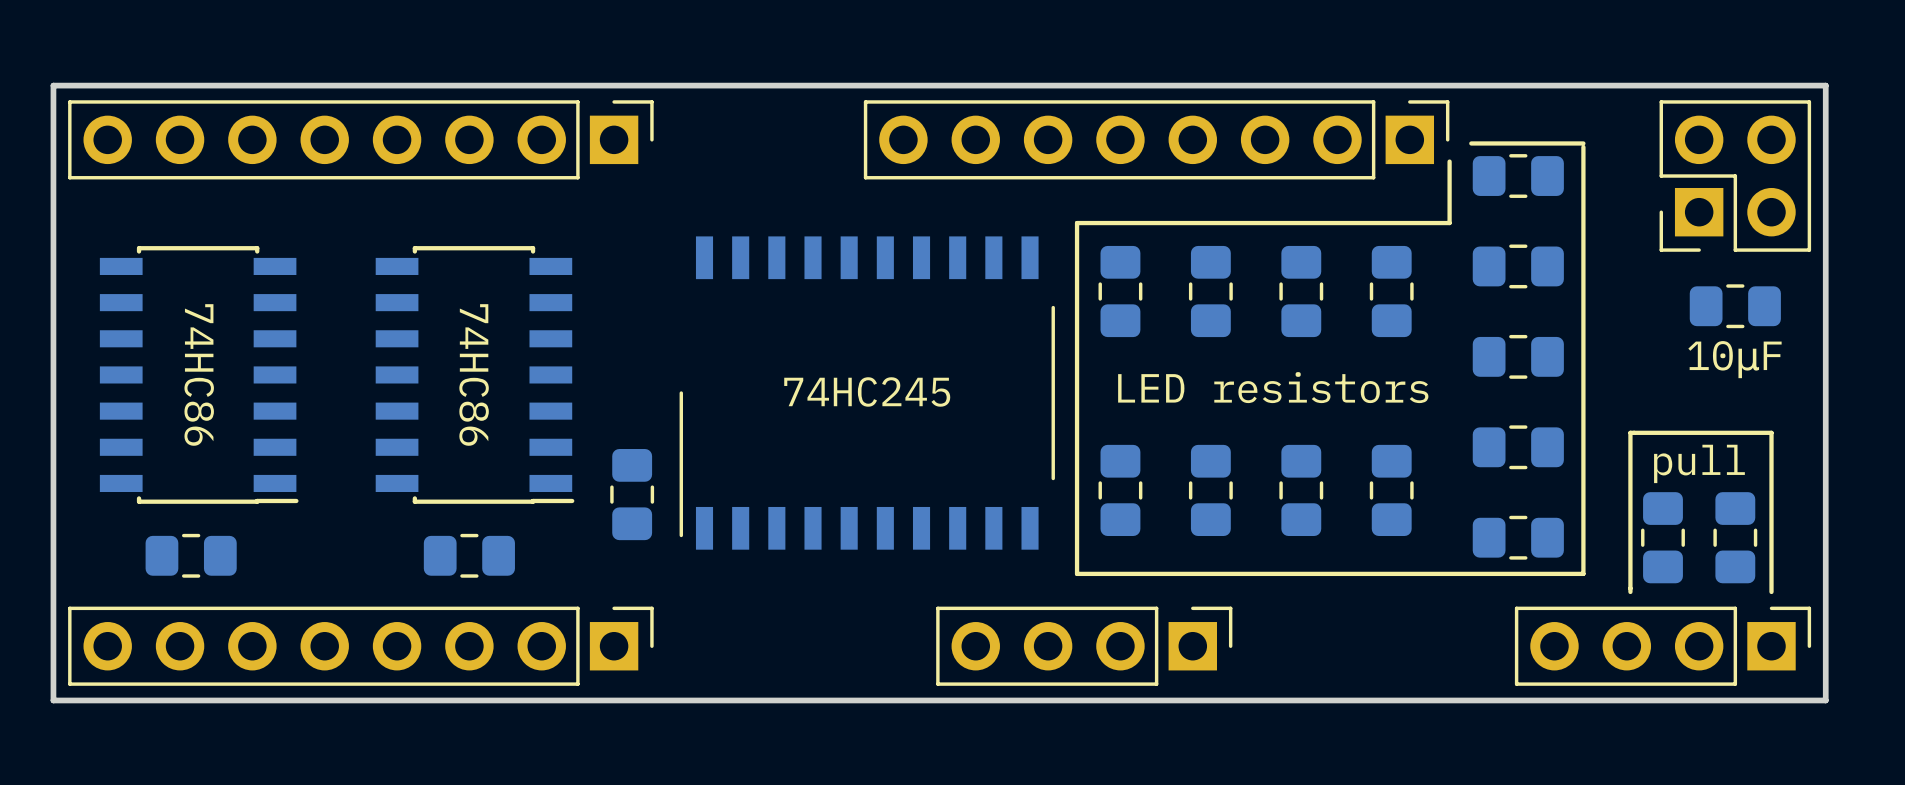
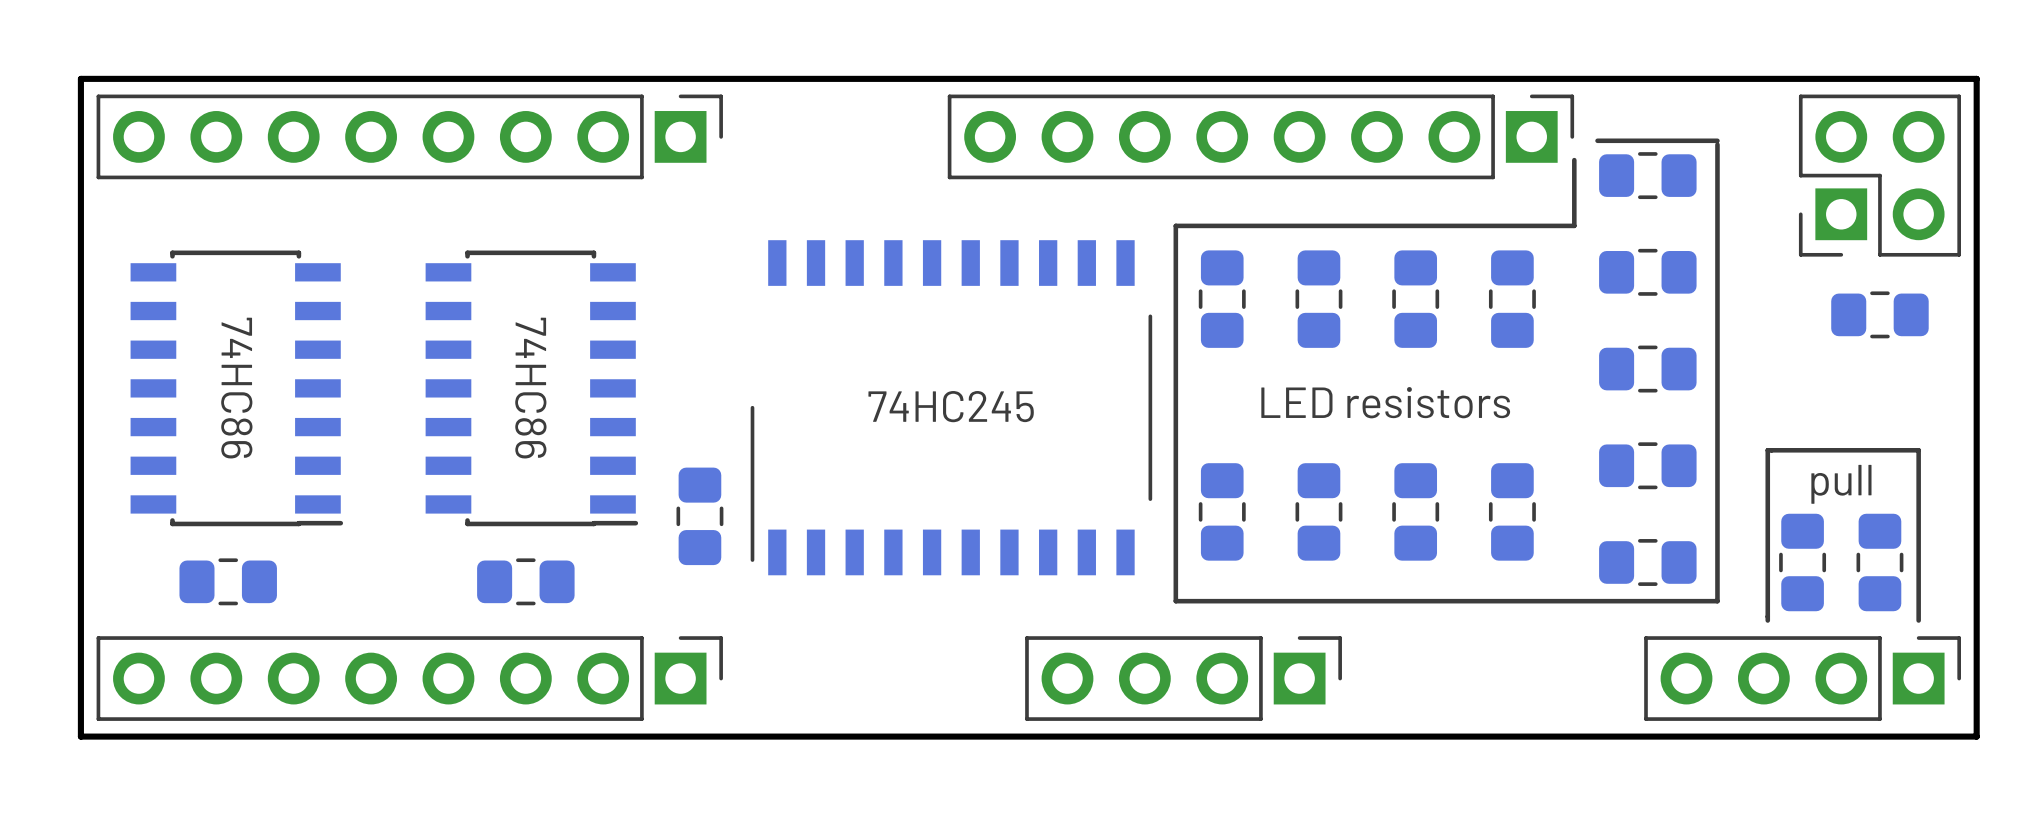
part value: 10μF (1734, 359) -> none

